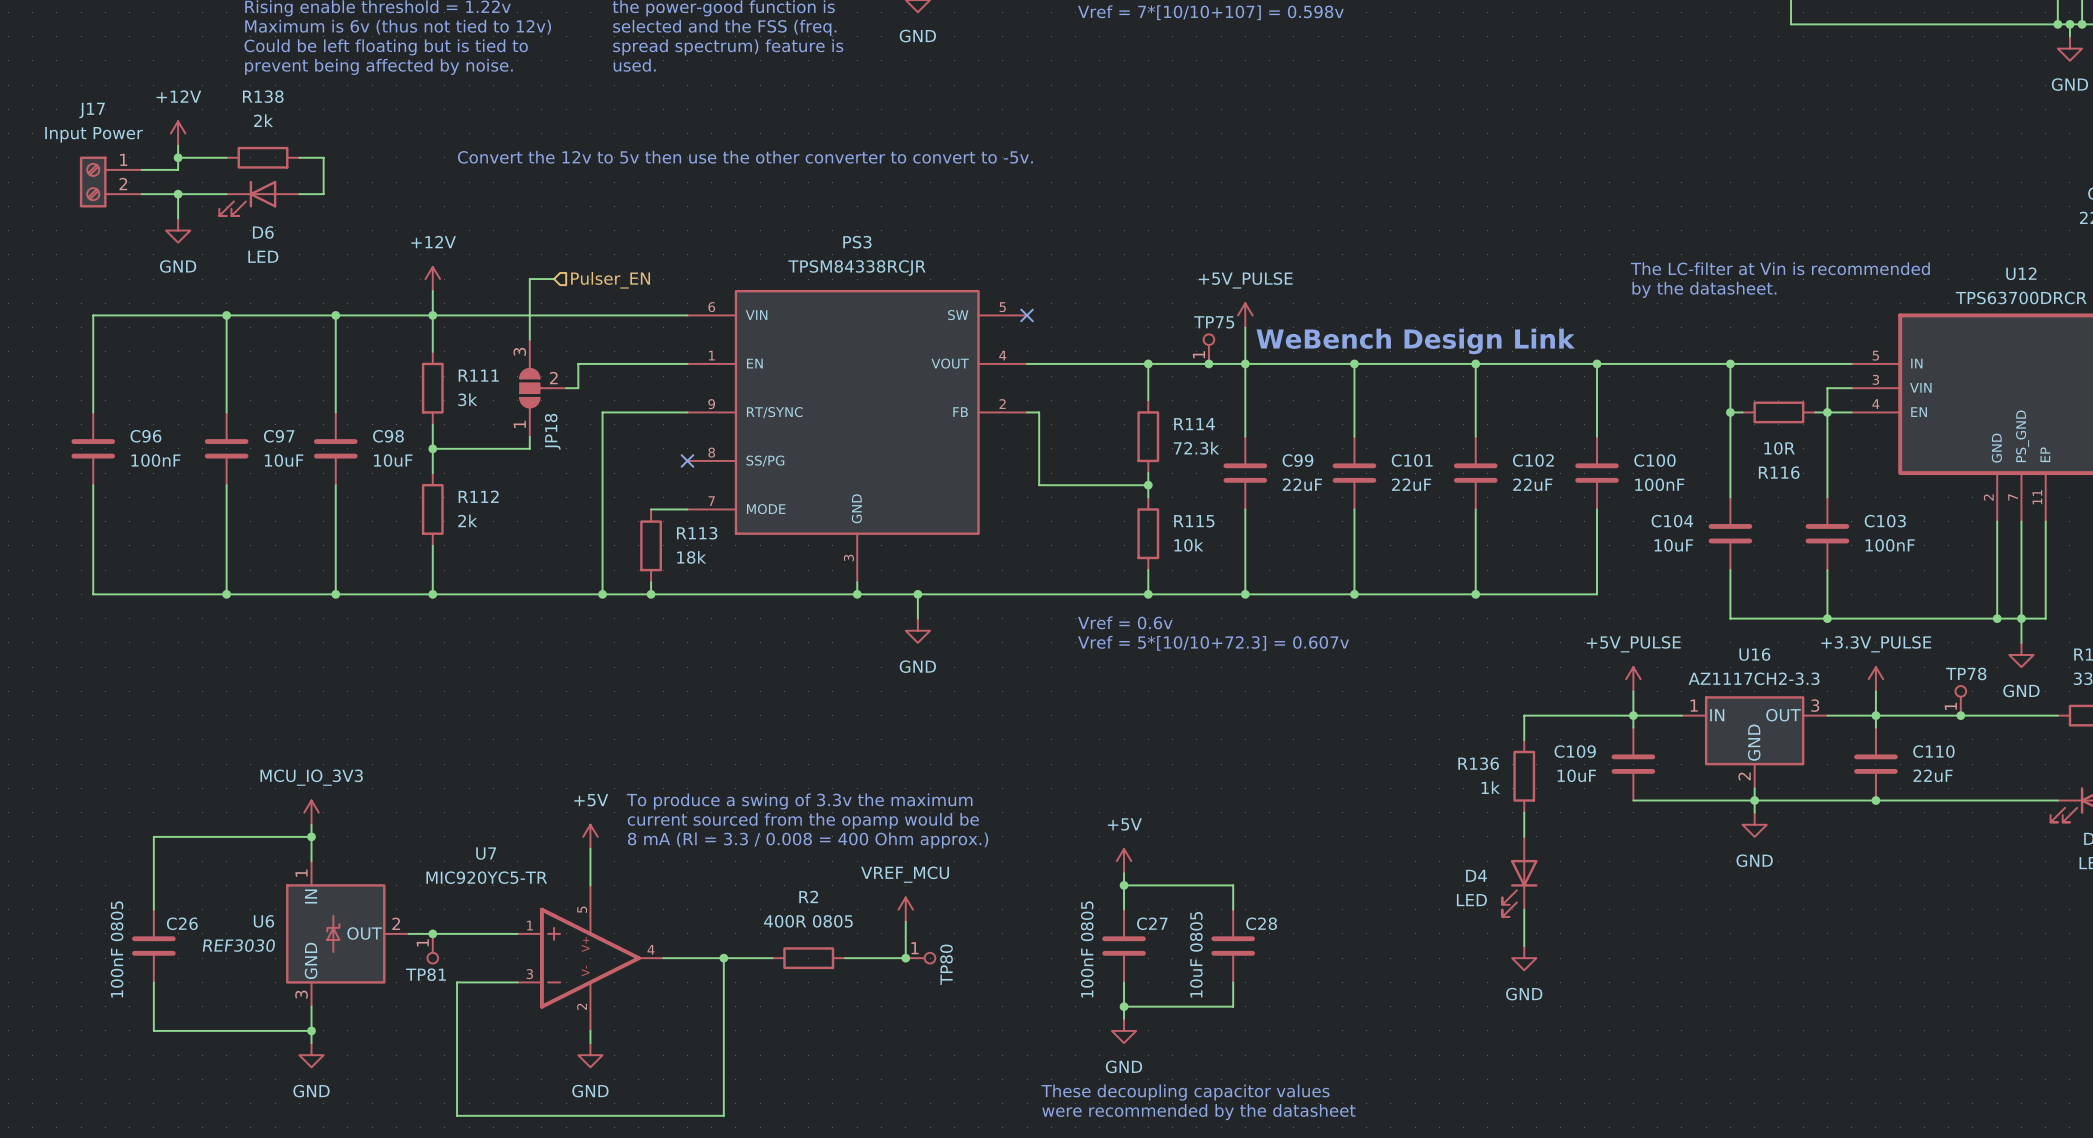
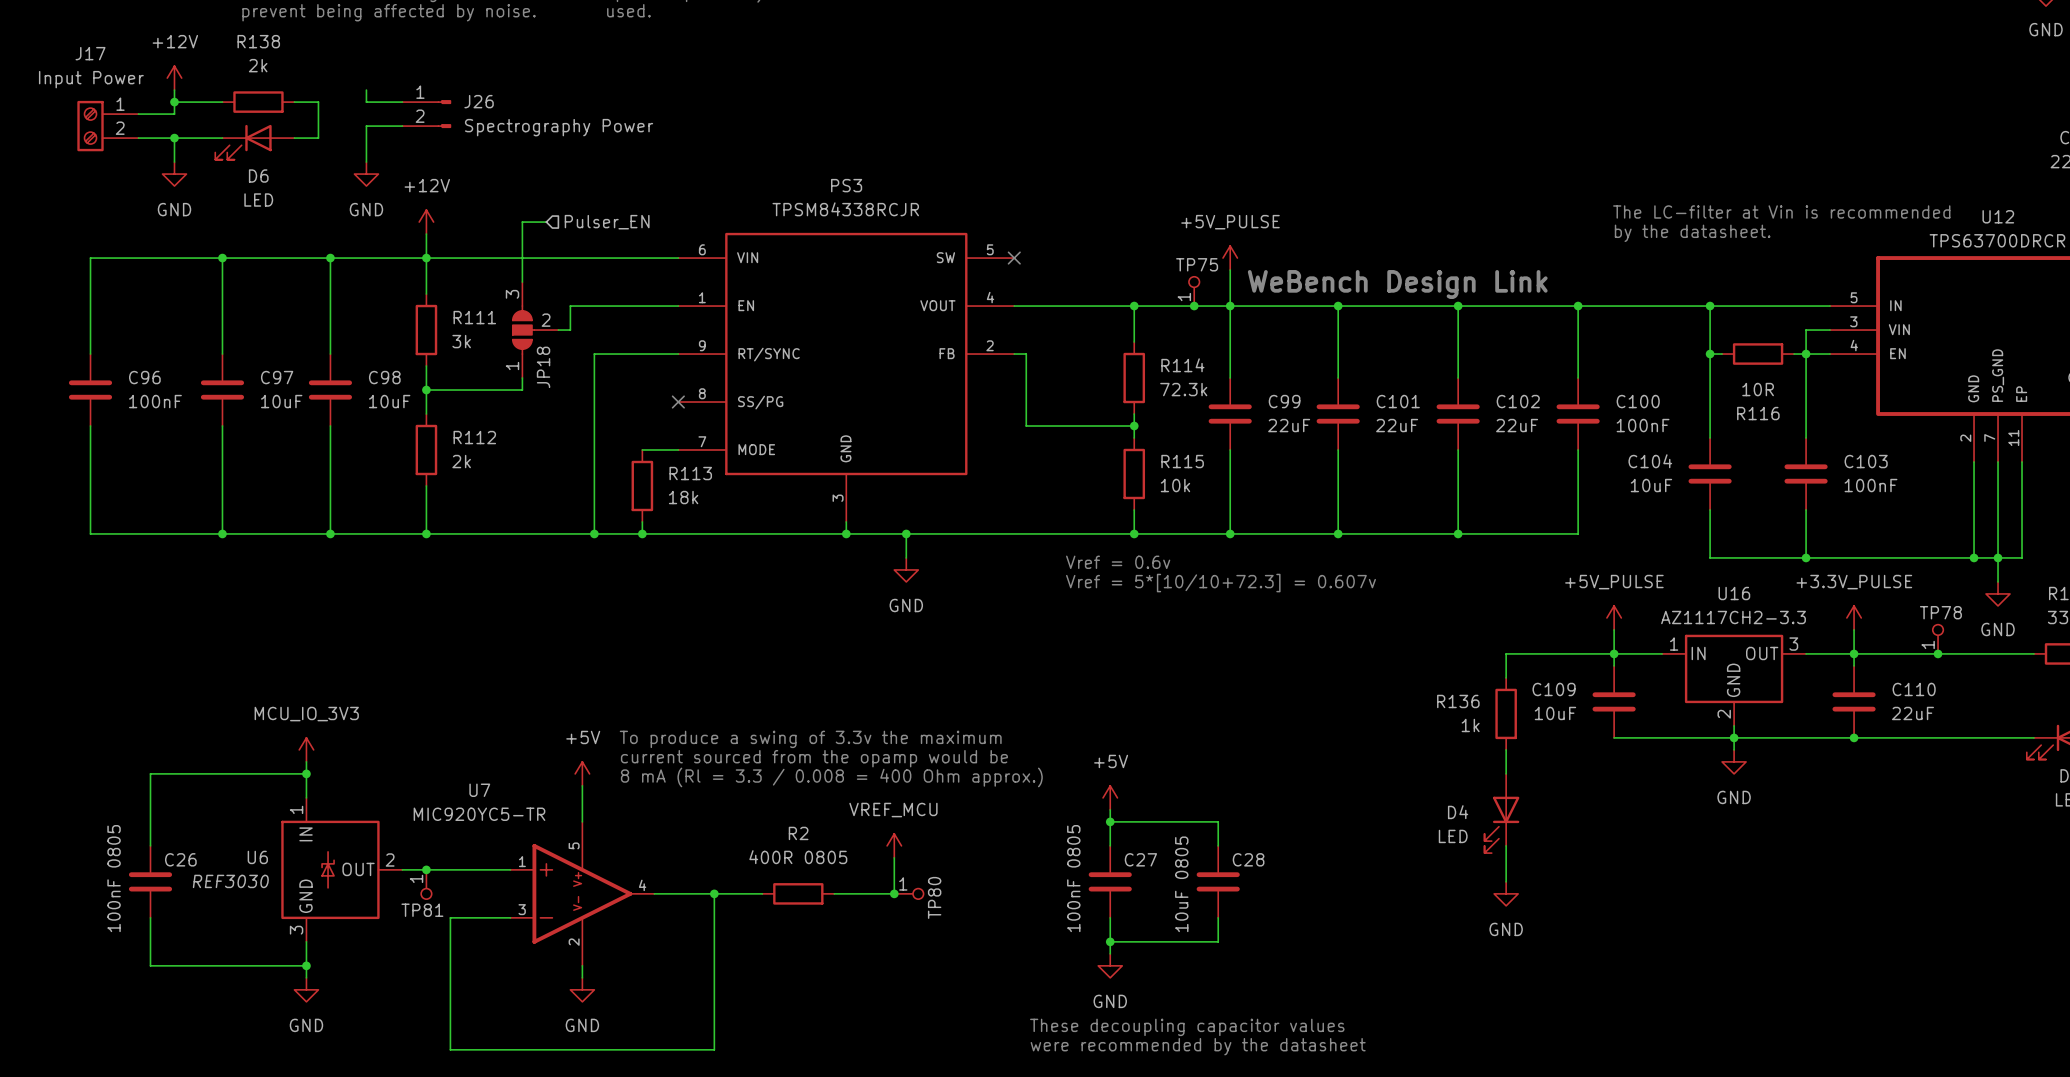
wire: none -> (366, 90) (366, 102) (402, 102)
text: Convert the 12v to 5v then use the other converter to convert to -5v. (745, 157) -> none
J26: none -> Spectrography Power (426, 114)
wire: none -> (402, 126) (366, 126) (366, 162)
power symbol: none -> GND (366, 174)

